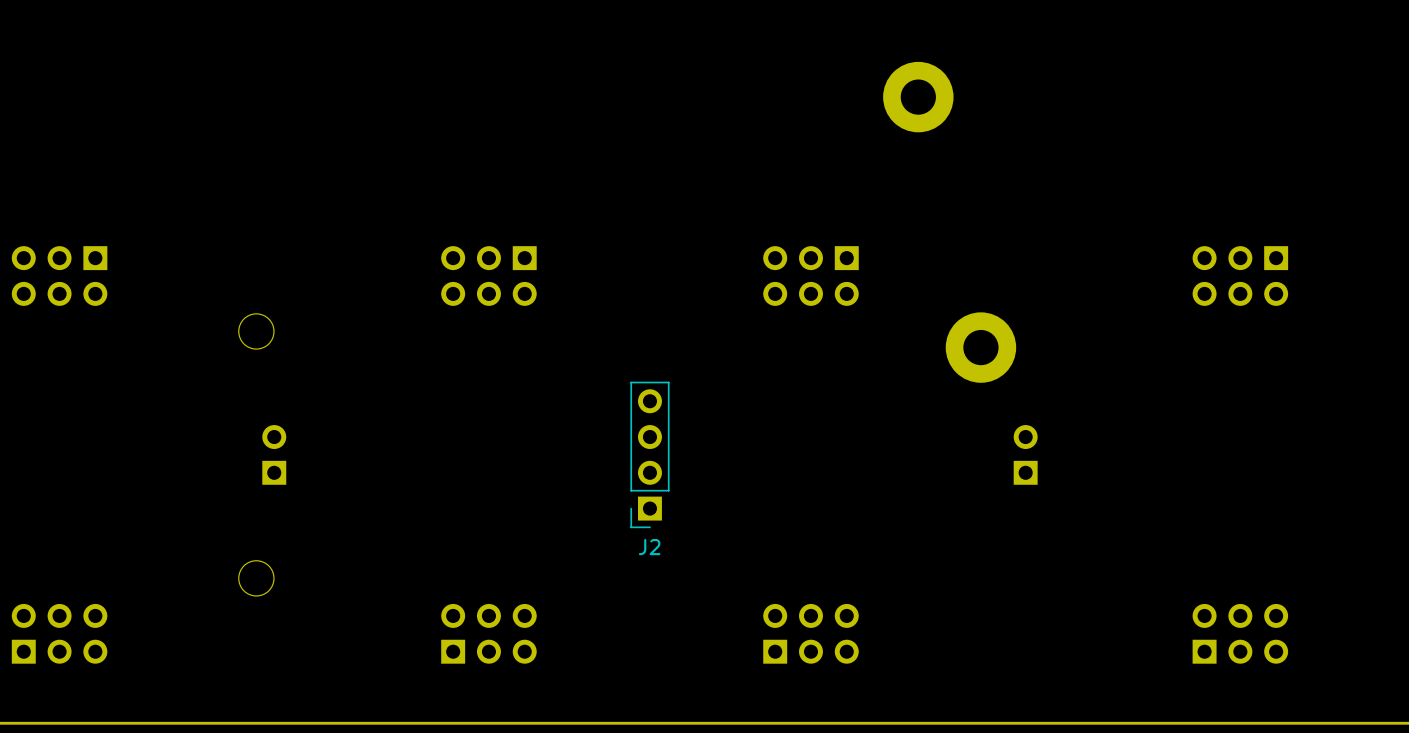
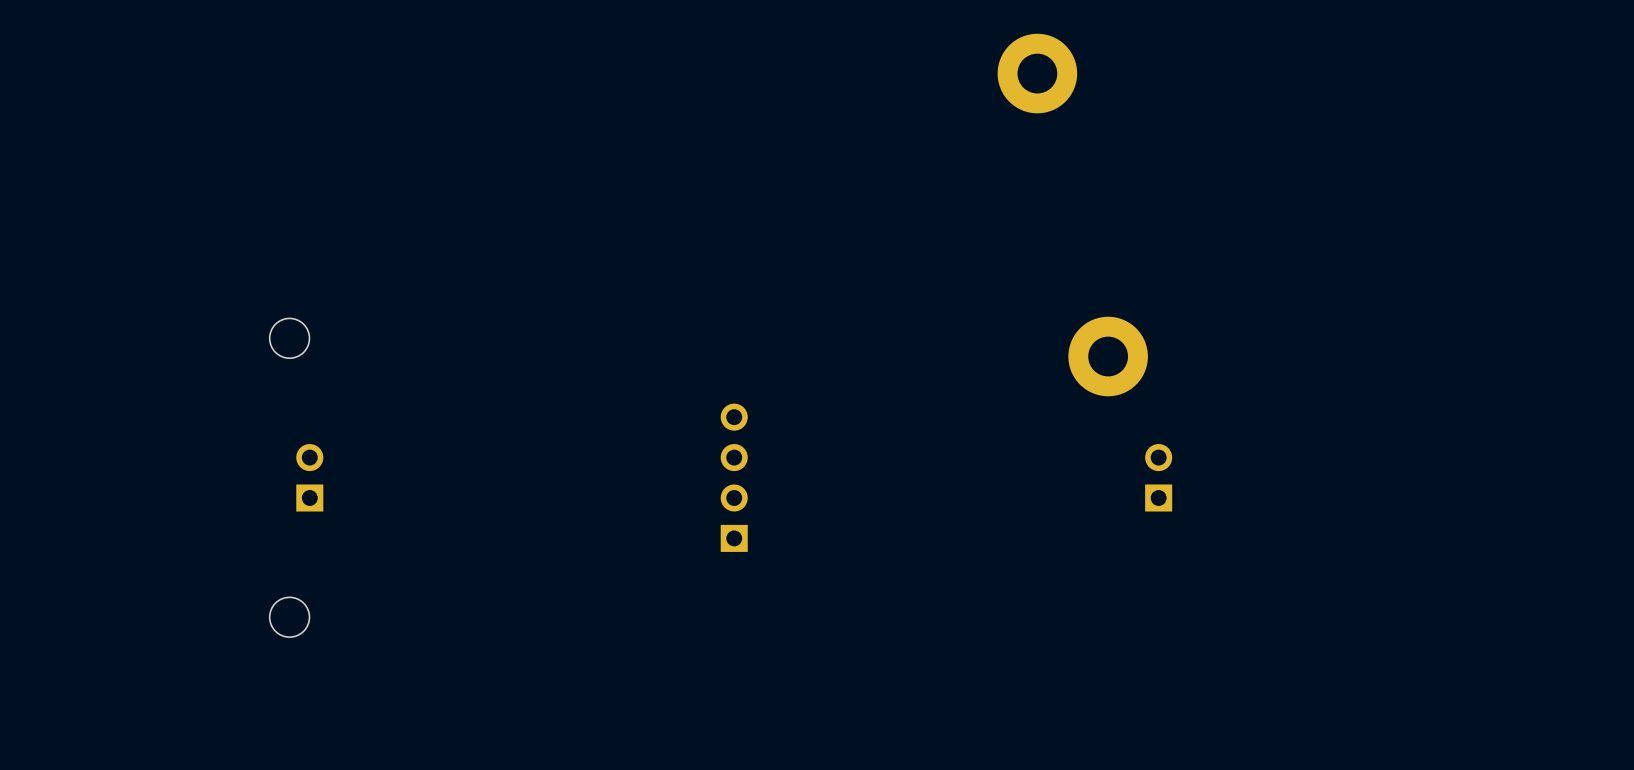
part: (59, 276) -> none
part: (488, 276) -> none
part: (810, 276) -> none
part: (1240, 276) -> none
J2 side: bottom (649, 454) -> top (734, 477)
part: (59, 633) -> none
part: (488, 633) -> none
part: (810, 633) -> none
part: (1240, 633) -> none

